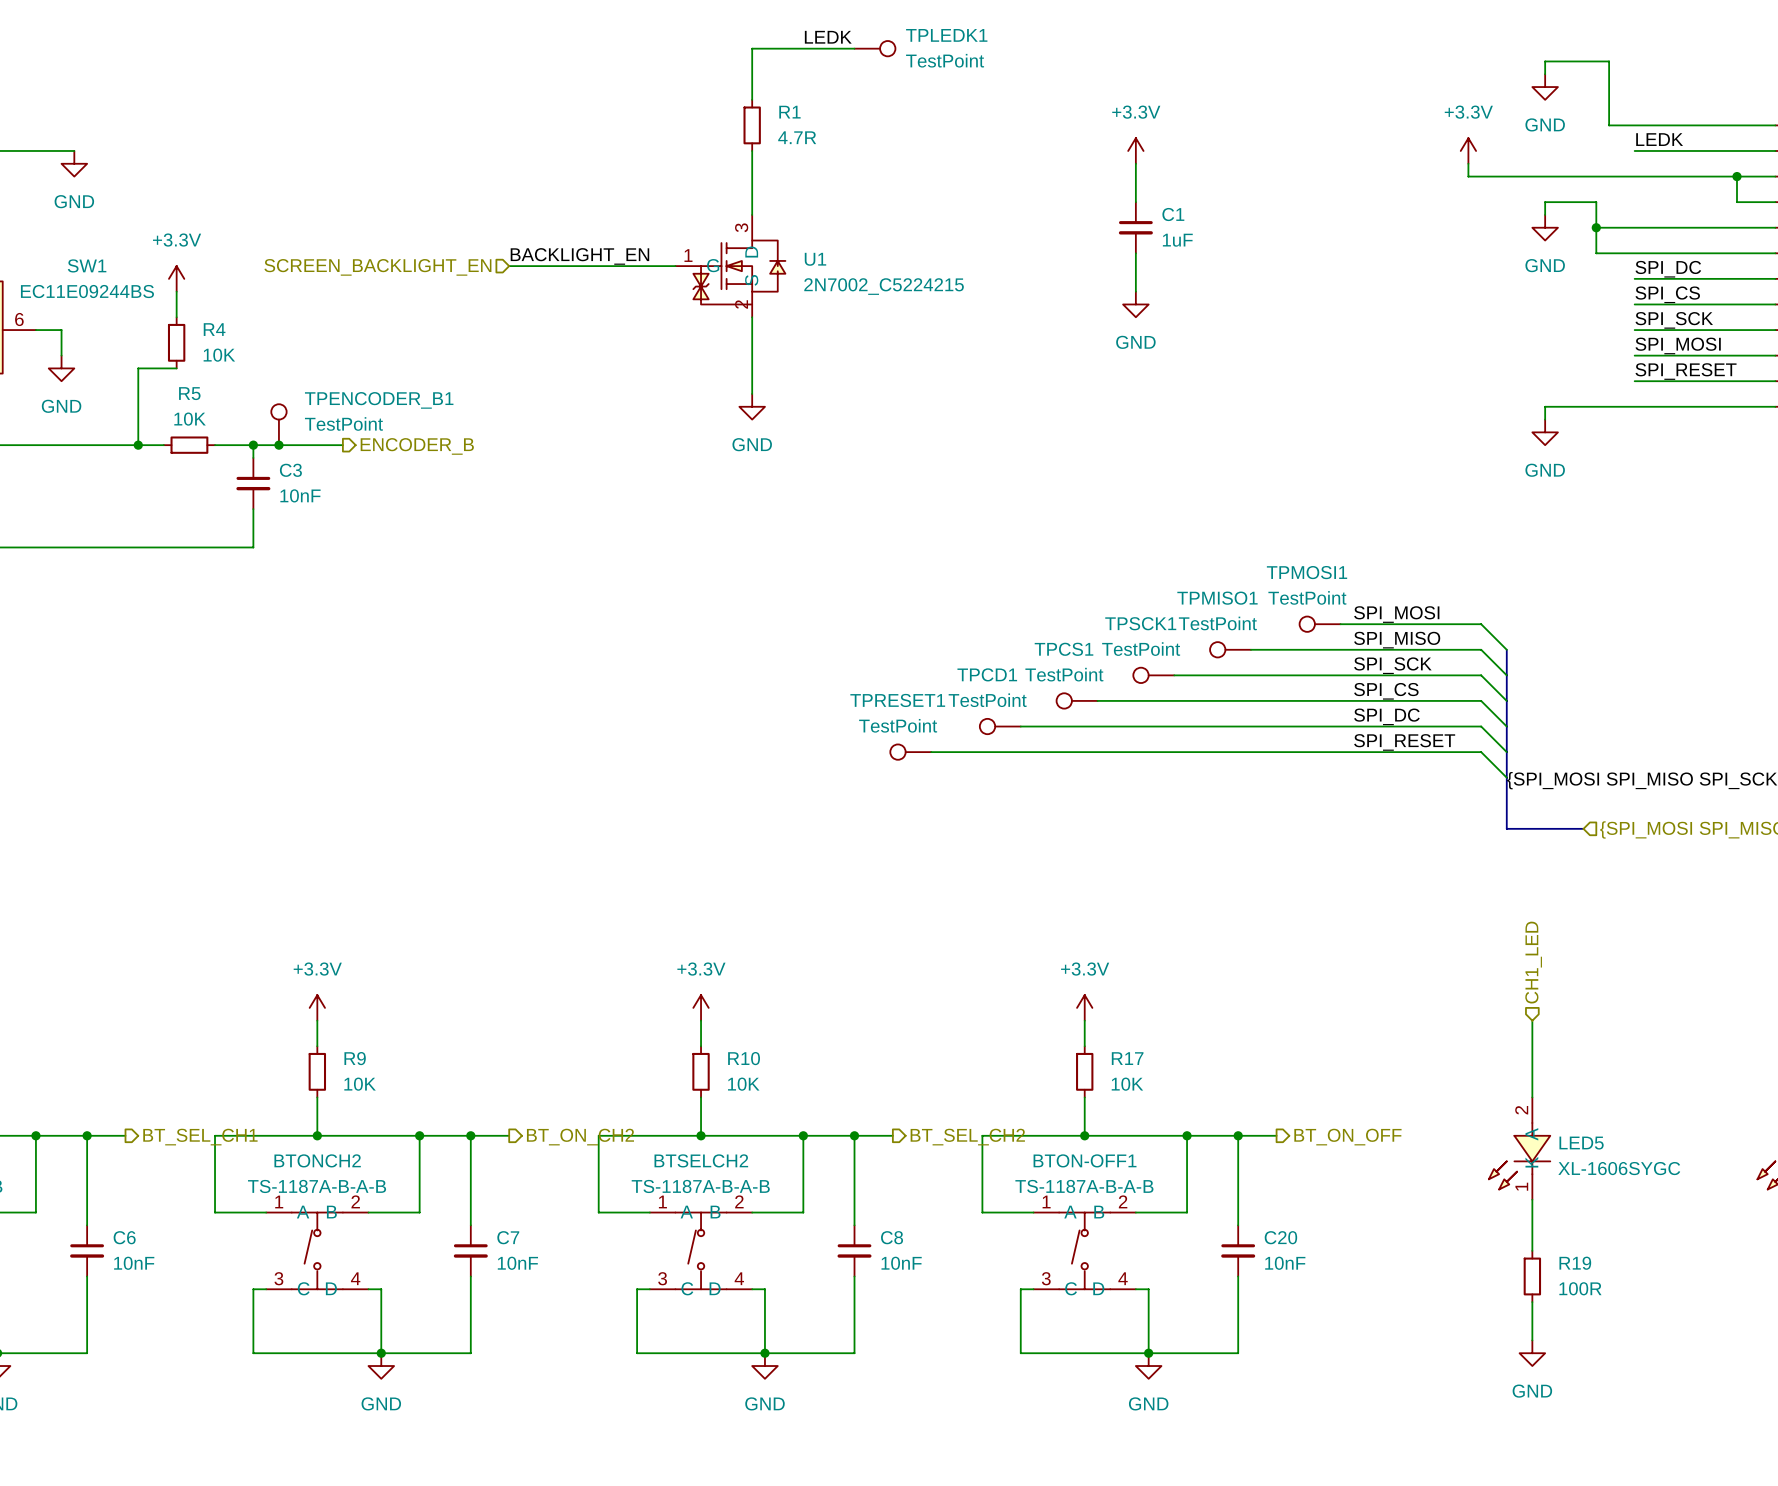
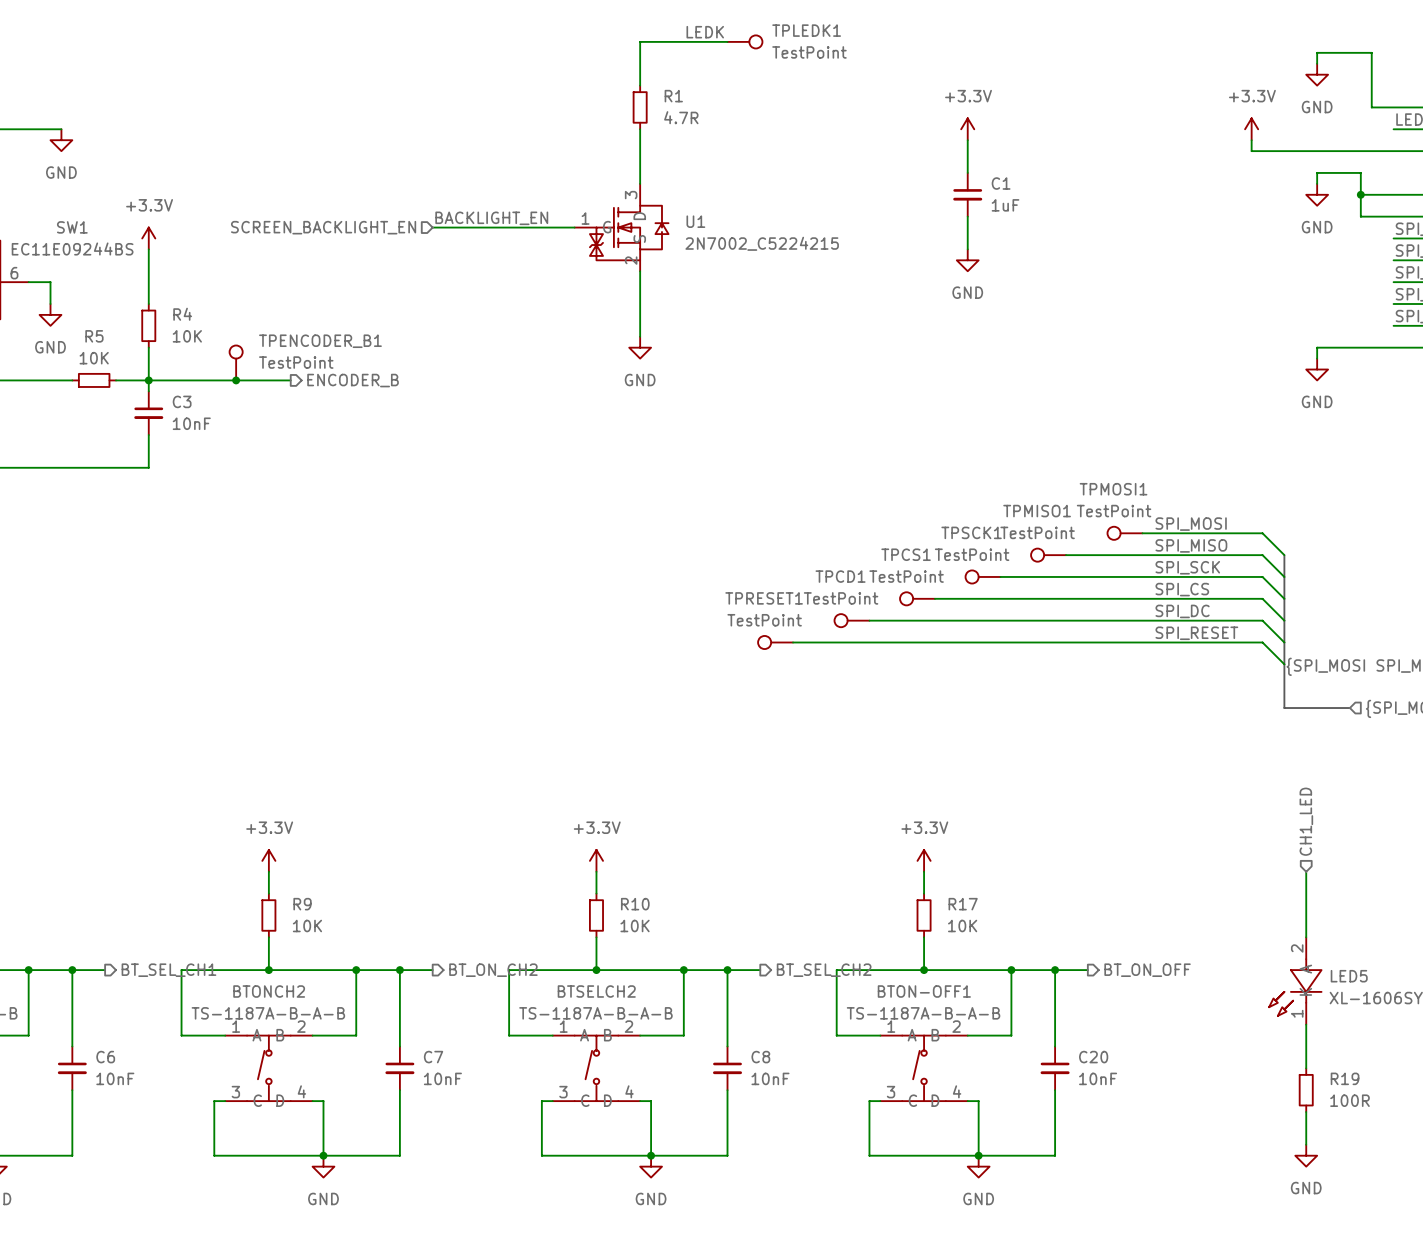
wire: none -> (148, 271) (148, 303)
R4 position: (176, 342) -> (148, 325)
wire: (176, 368) (138, 368) (138, 445) (87, 445) -> none
wire: none -> (148, 347) (148, 391)
junction: (138, 445) -> none
wire: none -> (137, 380) (181, 380)
junction: none -> (148, 380)
R5 position: (189, 445) -> (94, 380)
wire: (253, 445) (253, 457) -> none
junction: (253, 445) -> none
C3 position: (253, 483) -> (148, 413)
wire: (253, 509) (253, 547) (176, 547) -> (148, 435) (148, 467)

